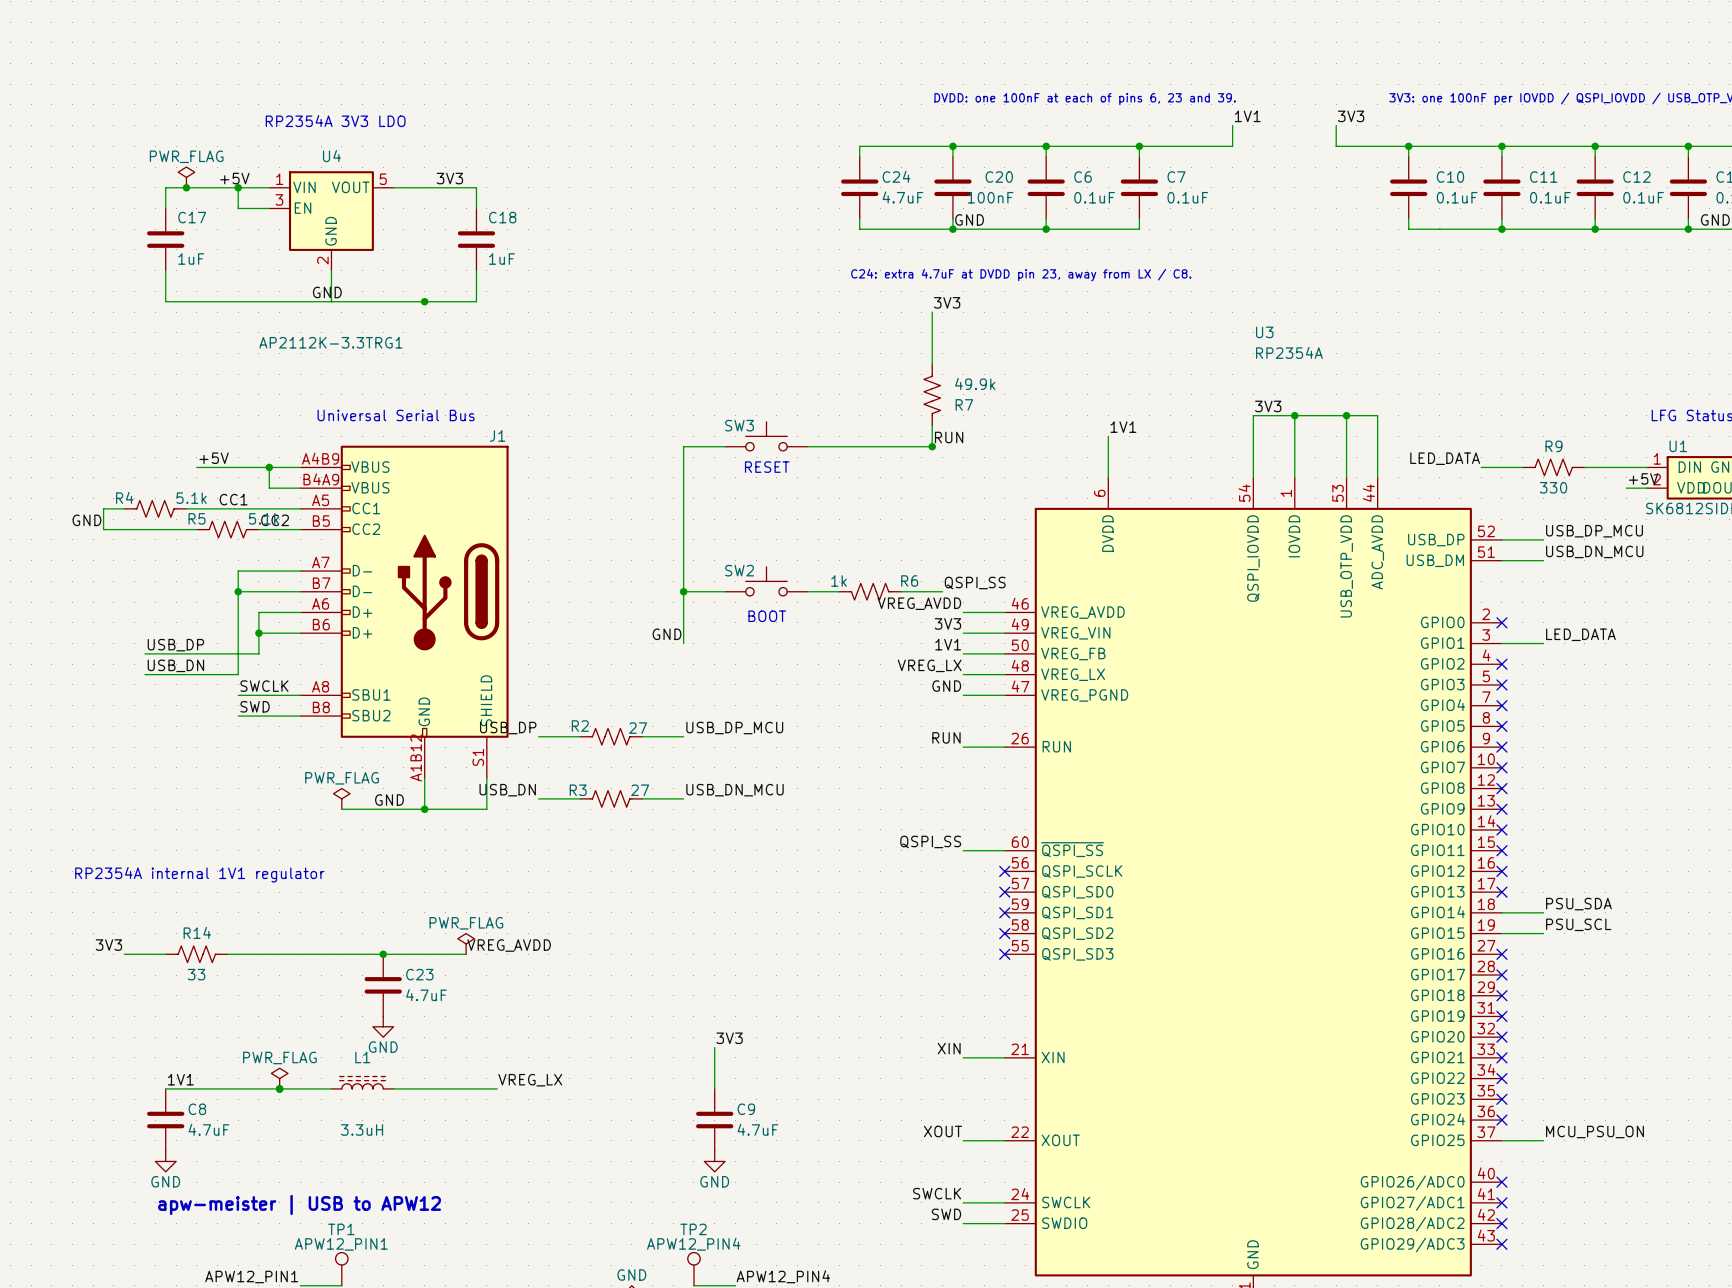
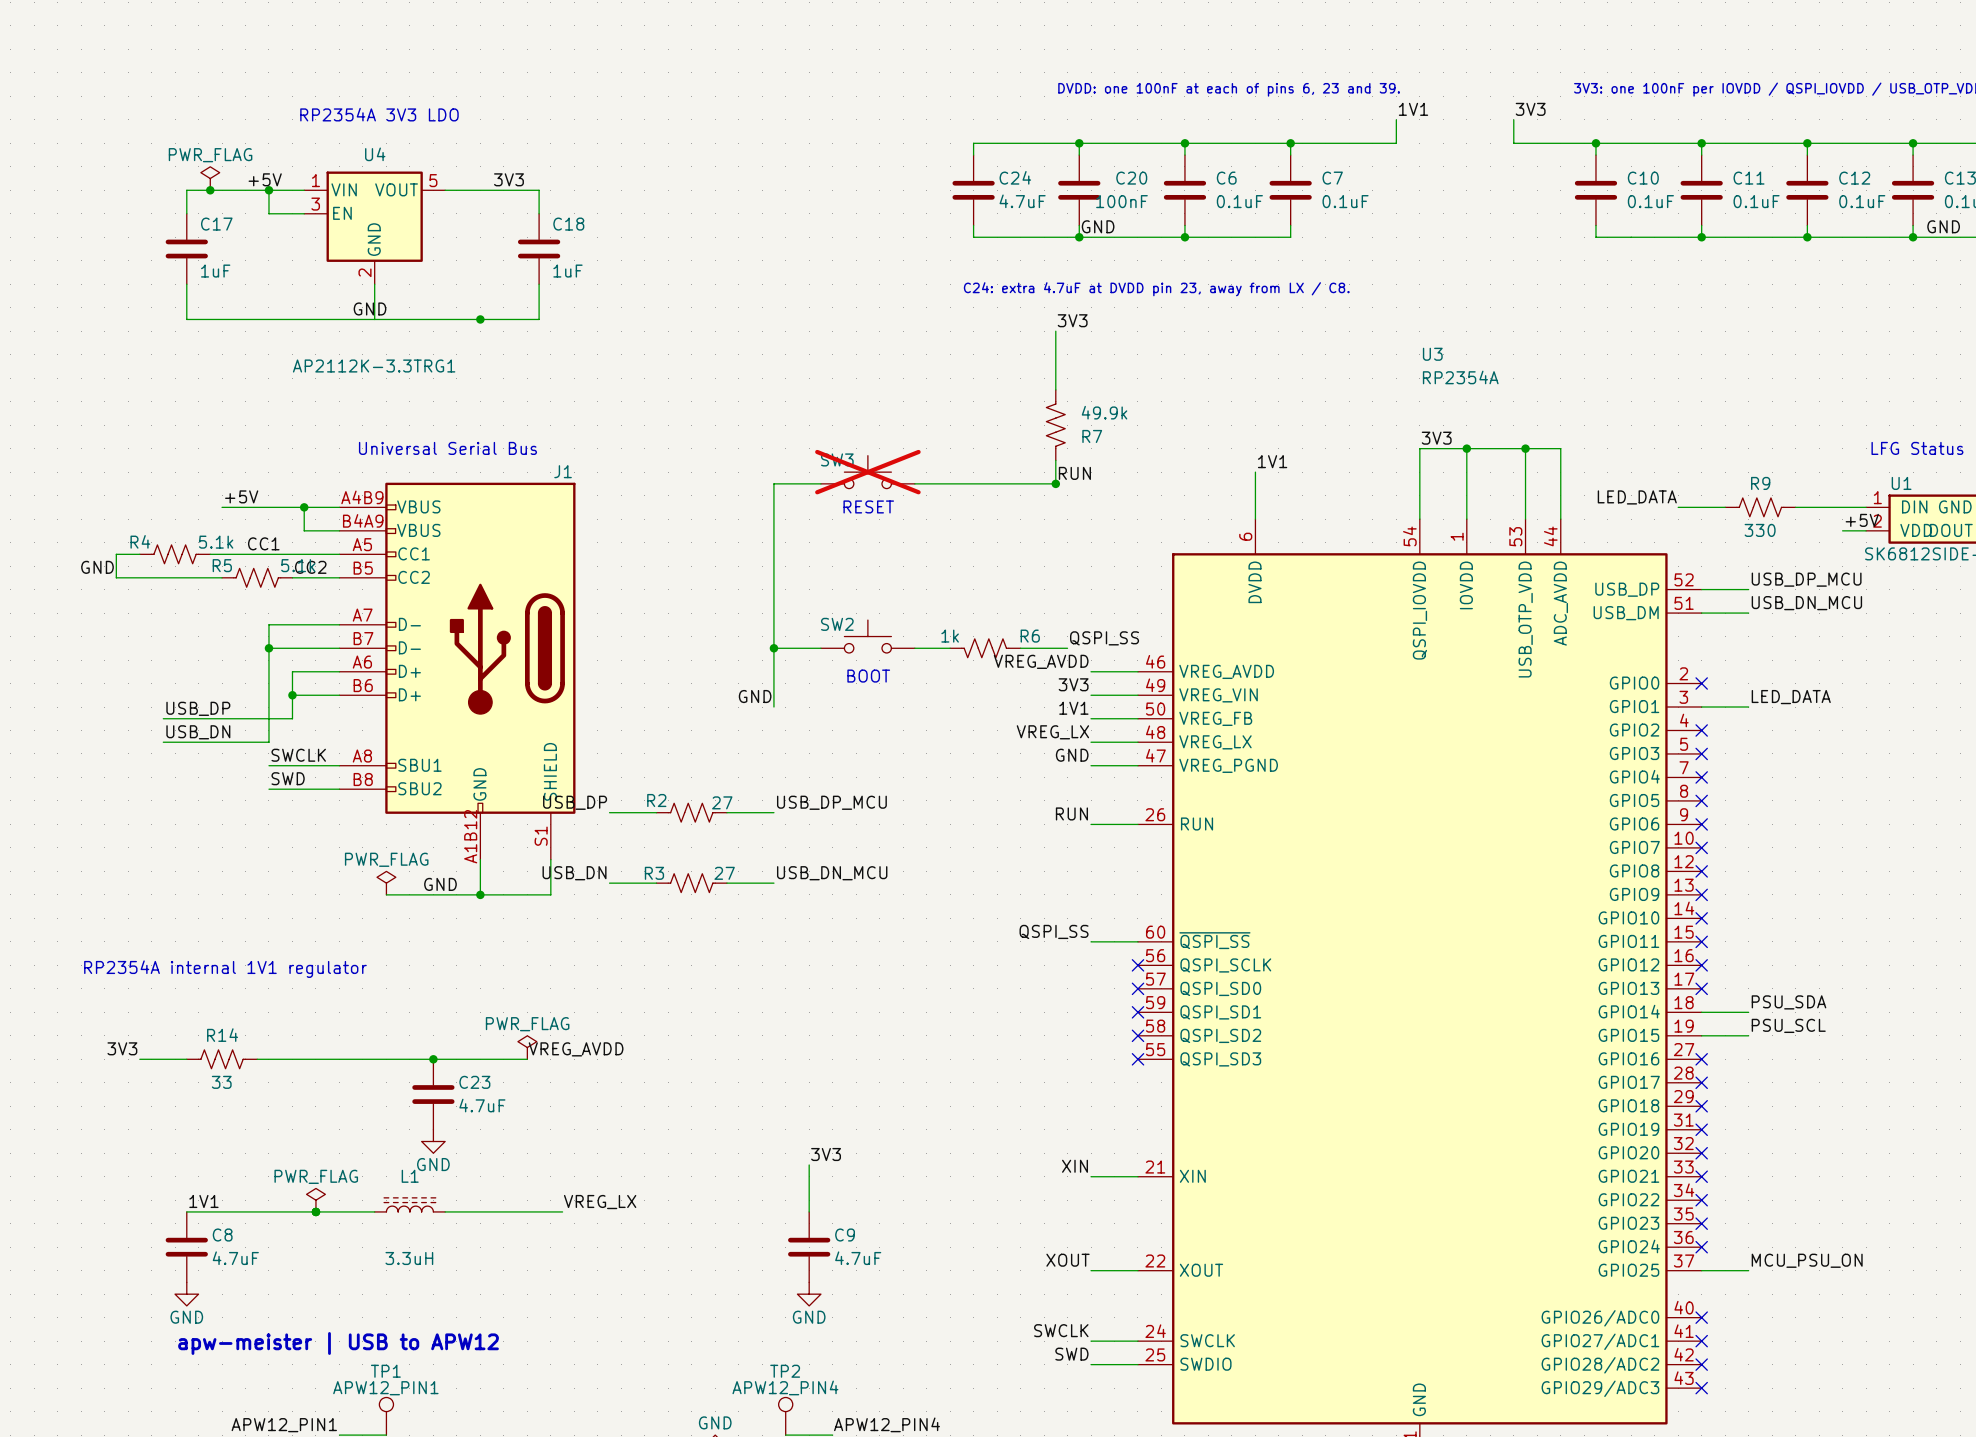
SW3 do-not-place cross: none -> (867, 472)

